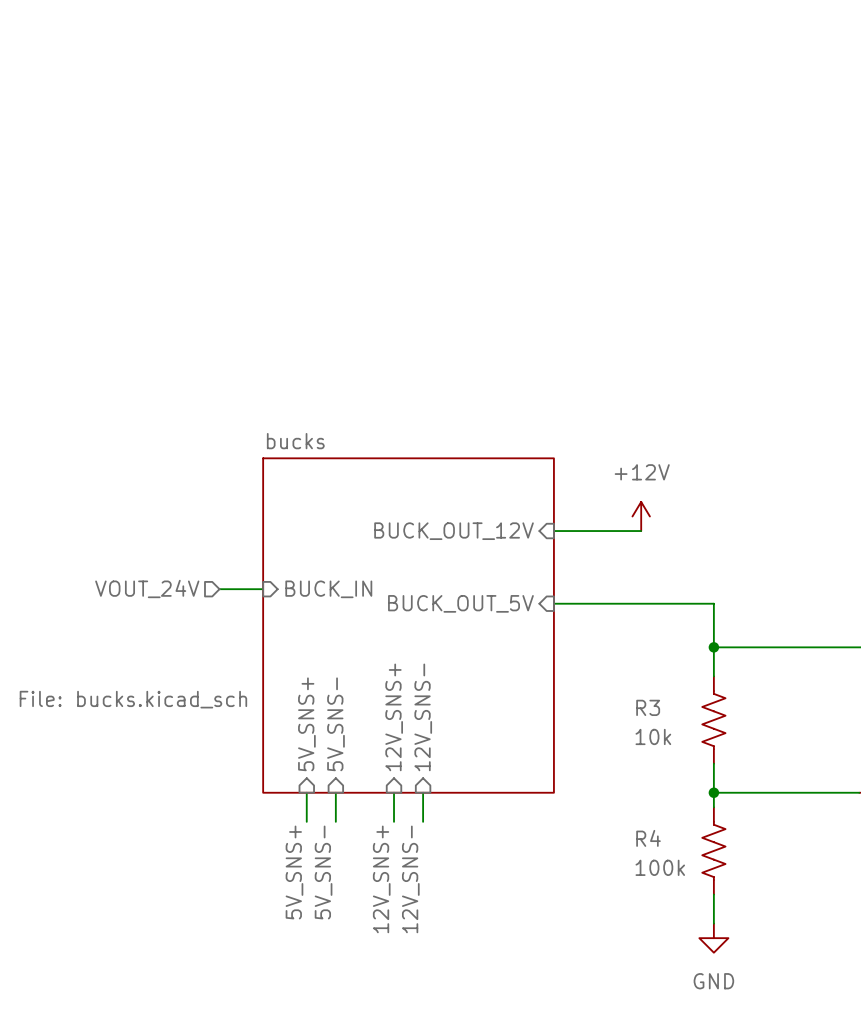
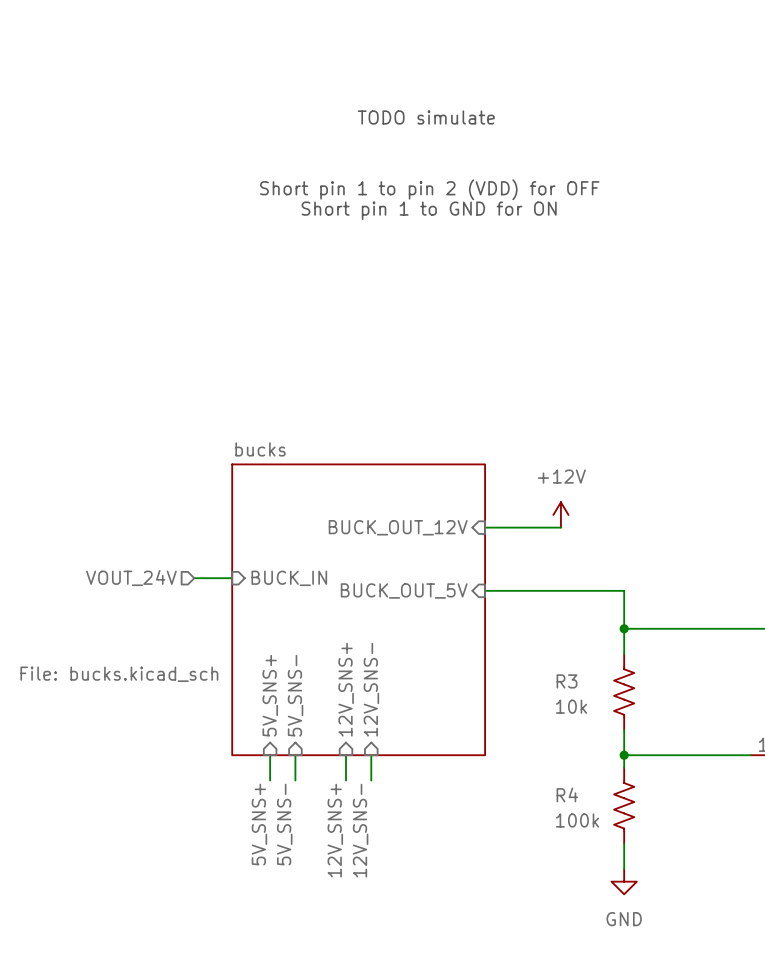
text: none -> TODO simulate (426, 117)
text: none -> Short pin 1 to pin 2 (VDD) for OFF (429, 189)
text: none -> Short pin 1 to GND for ON (429, 210)

